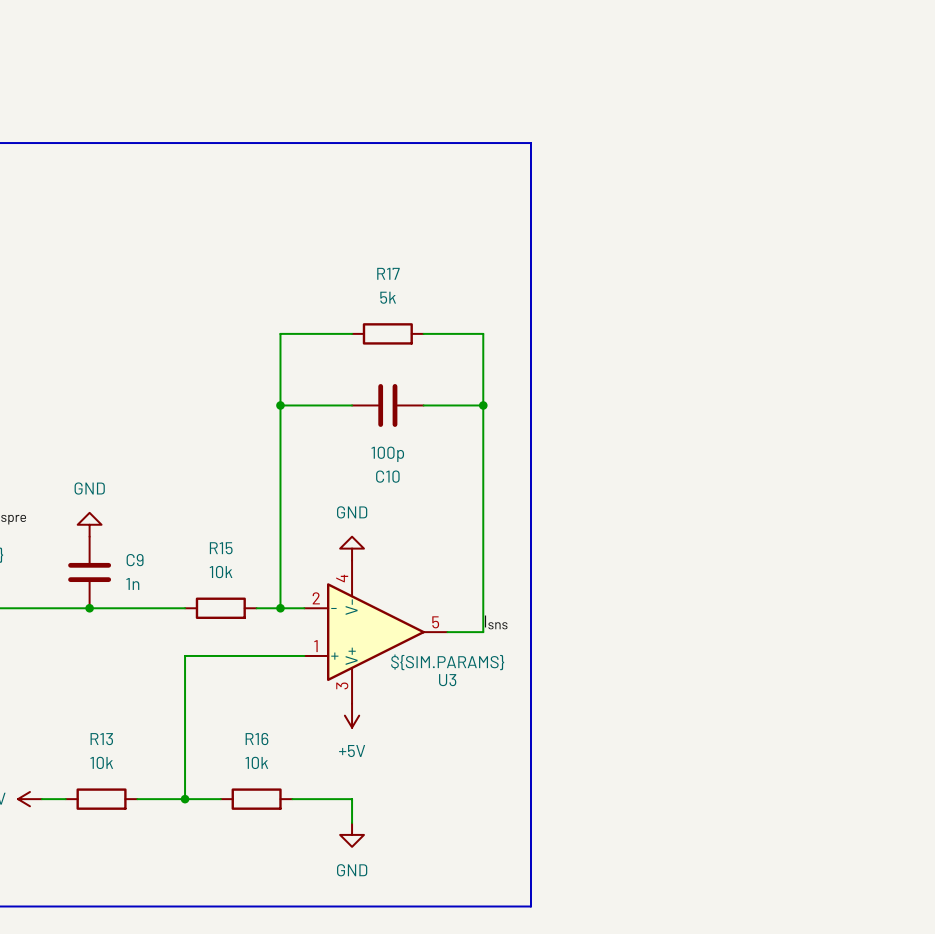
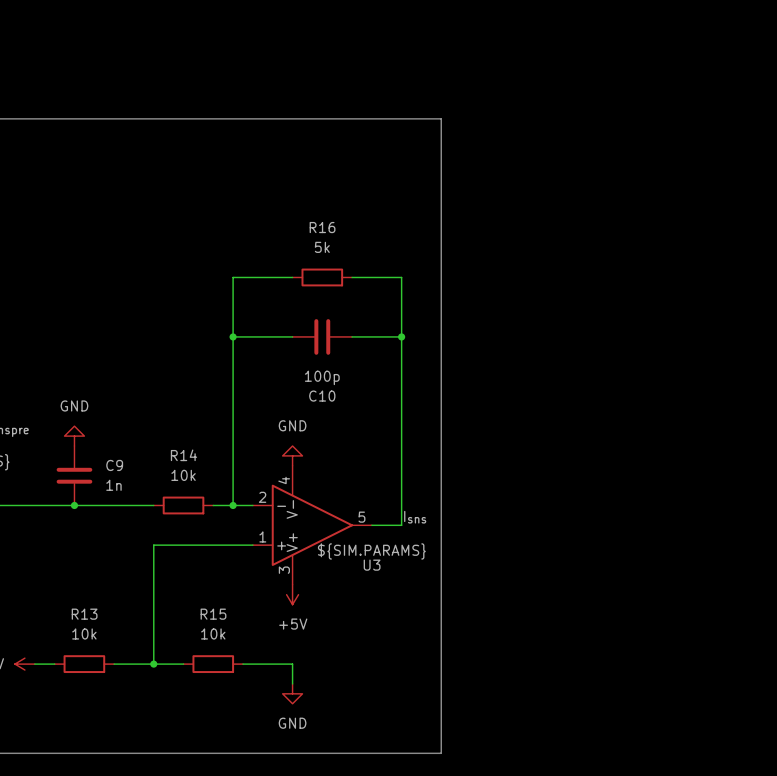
R17 name: R17 (388, 273) -> R16 (322, 227)
R15 name: R15 (221, 548) -> R14 (183, 455)
R16 name: R16 (256, 739) -> R15 (213, 614)

